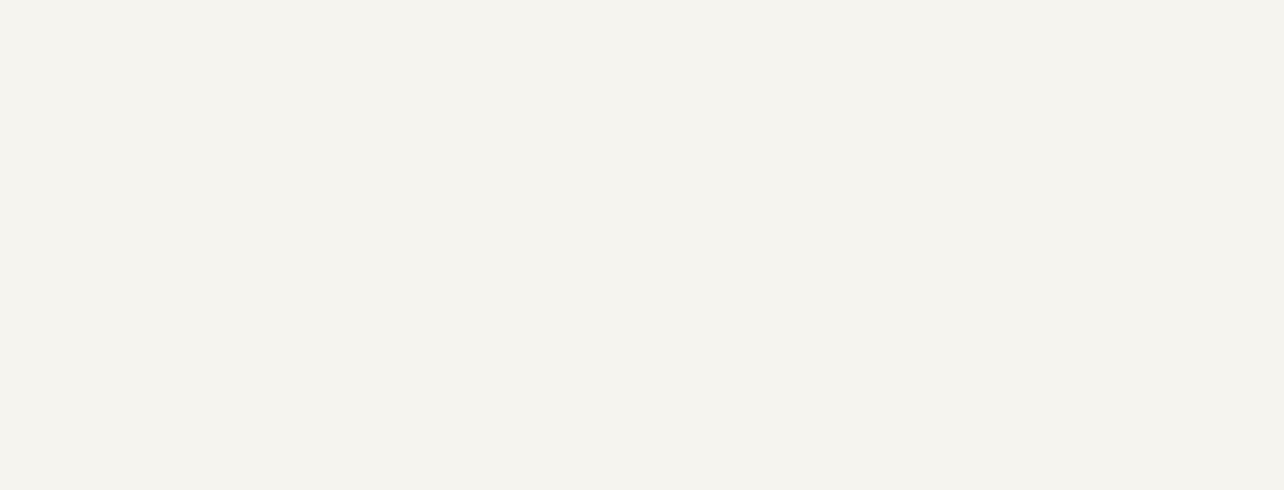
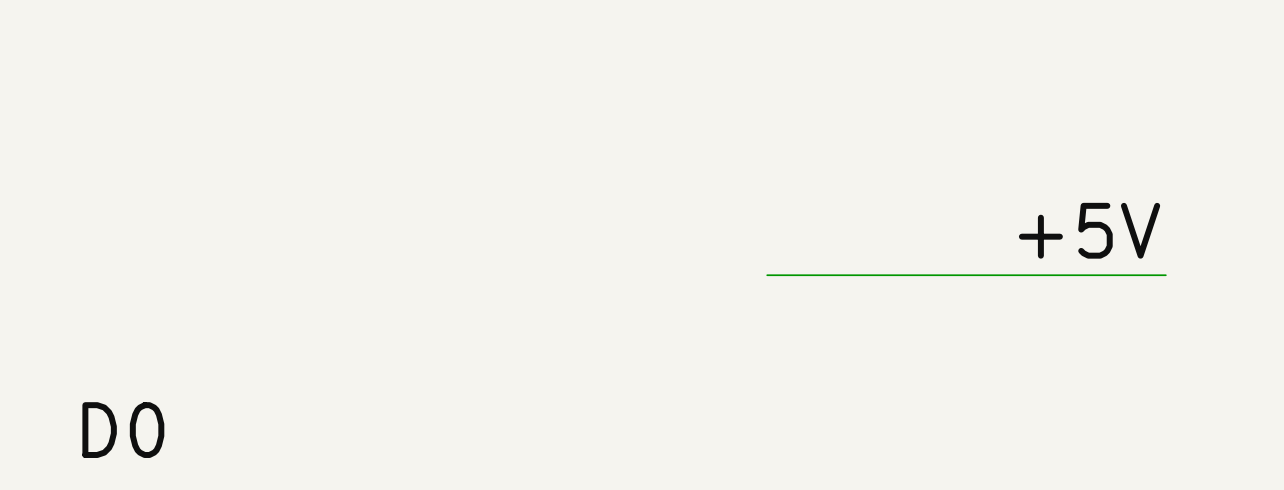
label: none -> +5V (1089, 230)
wire: none -> (767, 275) (1165, 275)
label: none -> D0 (123, 430)

